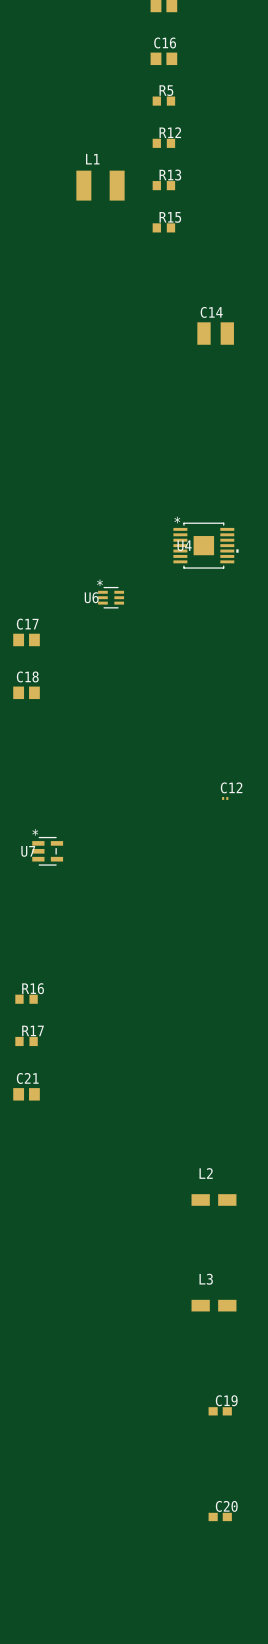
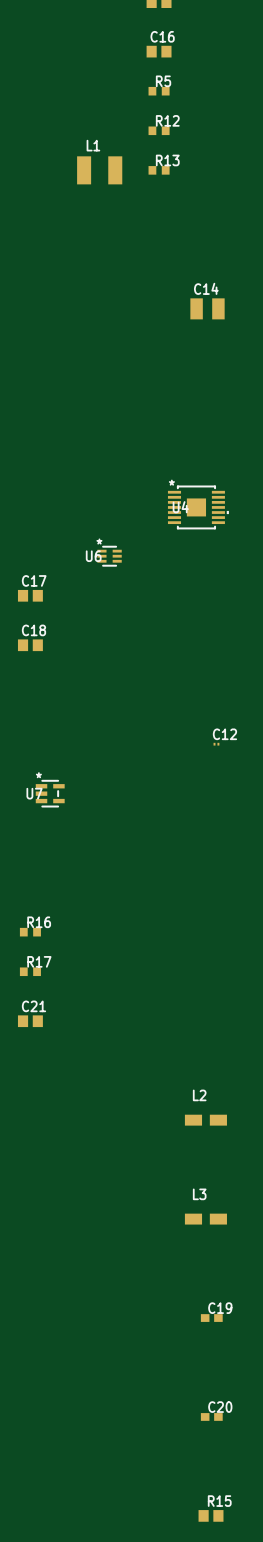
R15 footprint: [152, 223, 176, 233] -> [198, 1510, 224, 1522]

